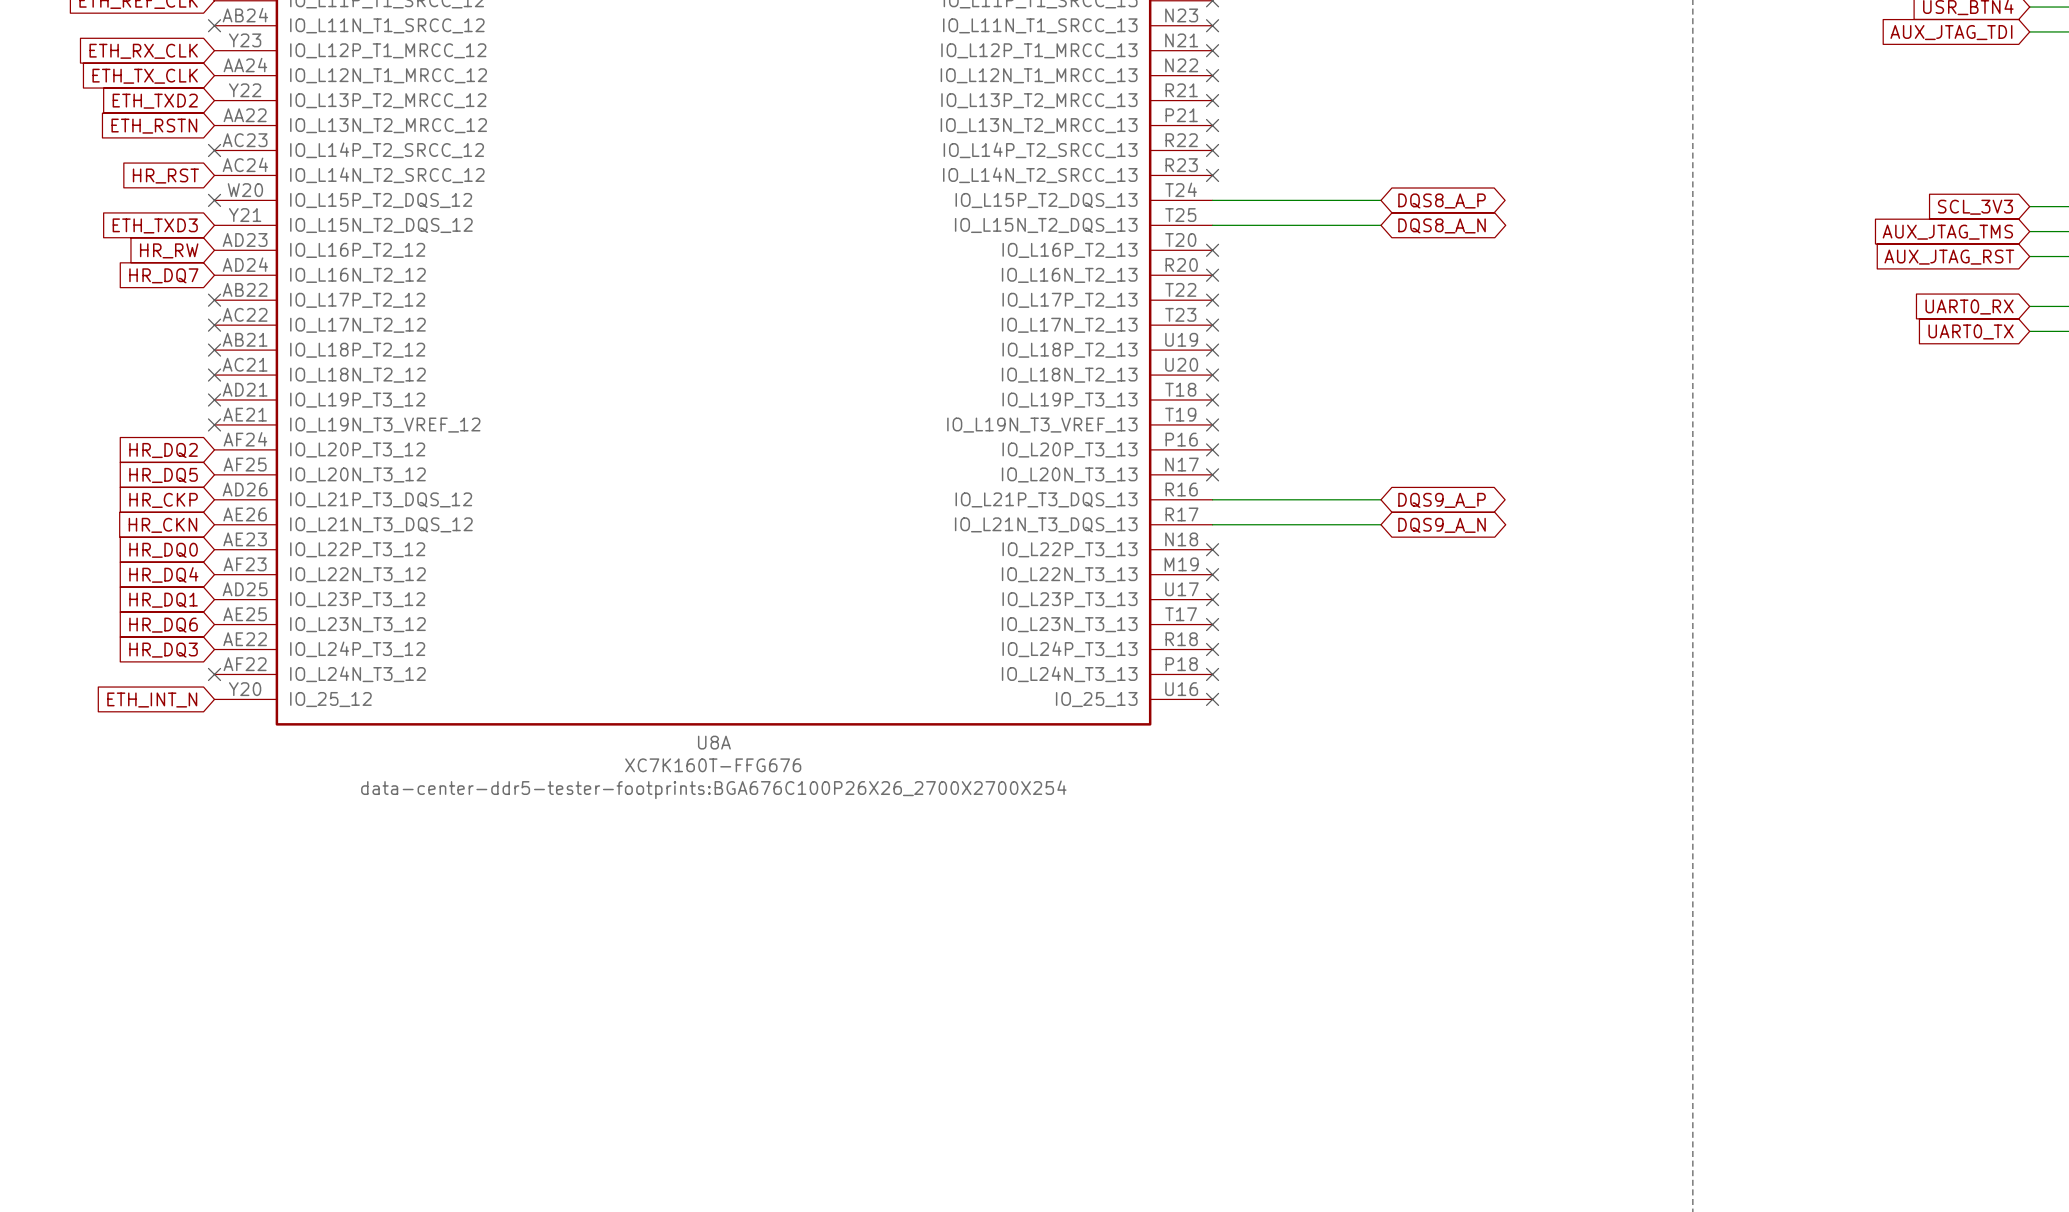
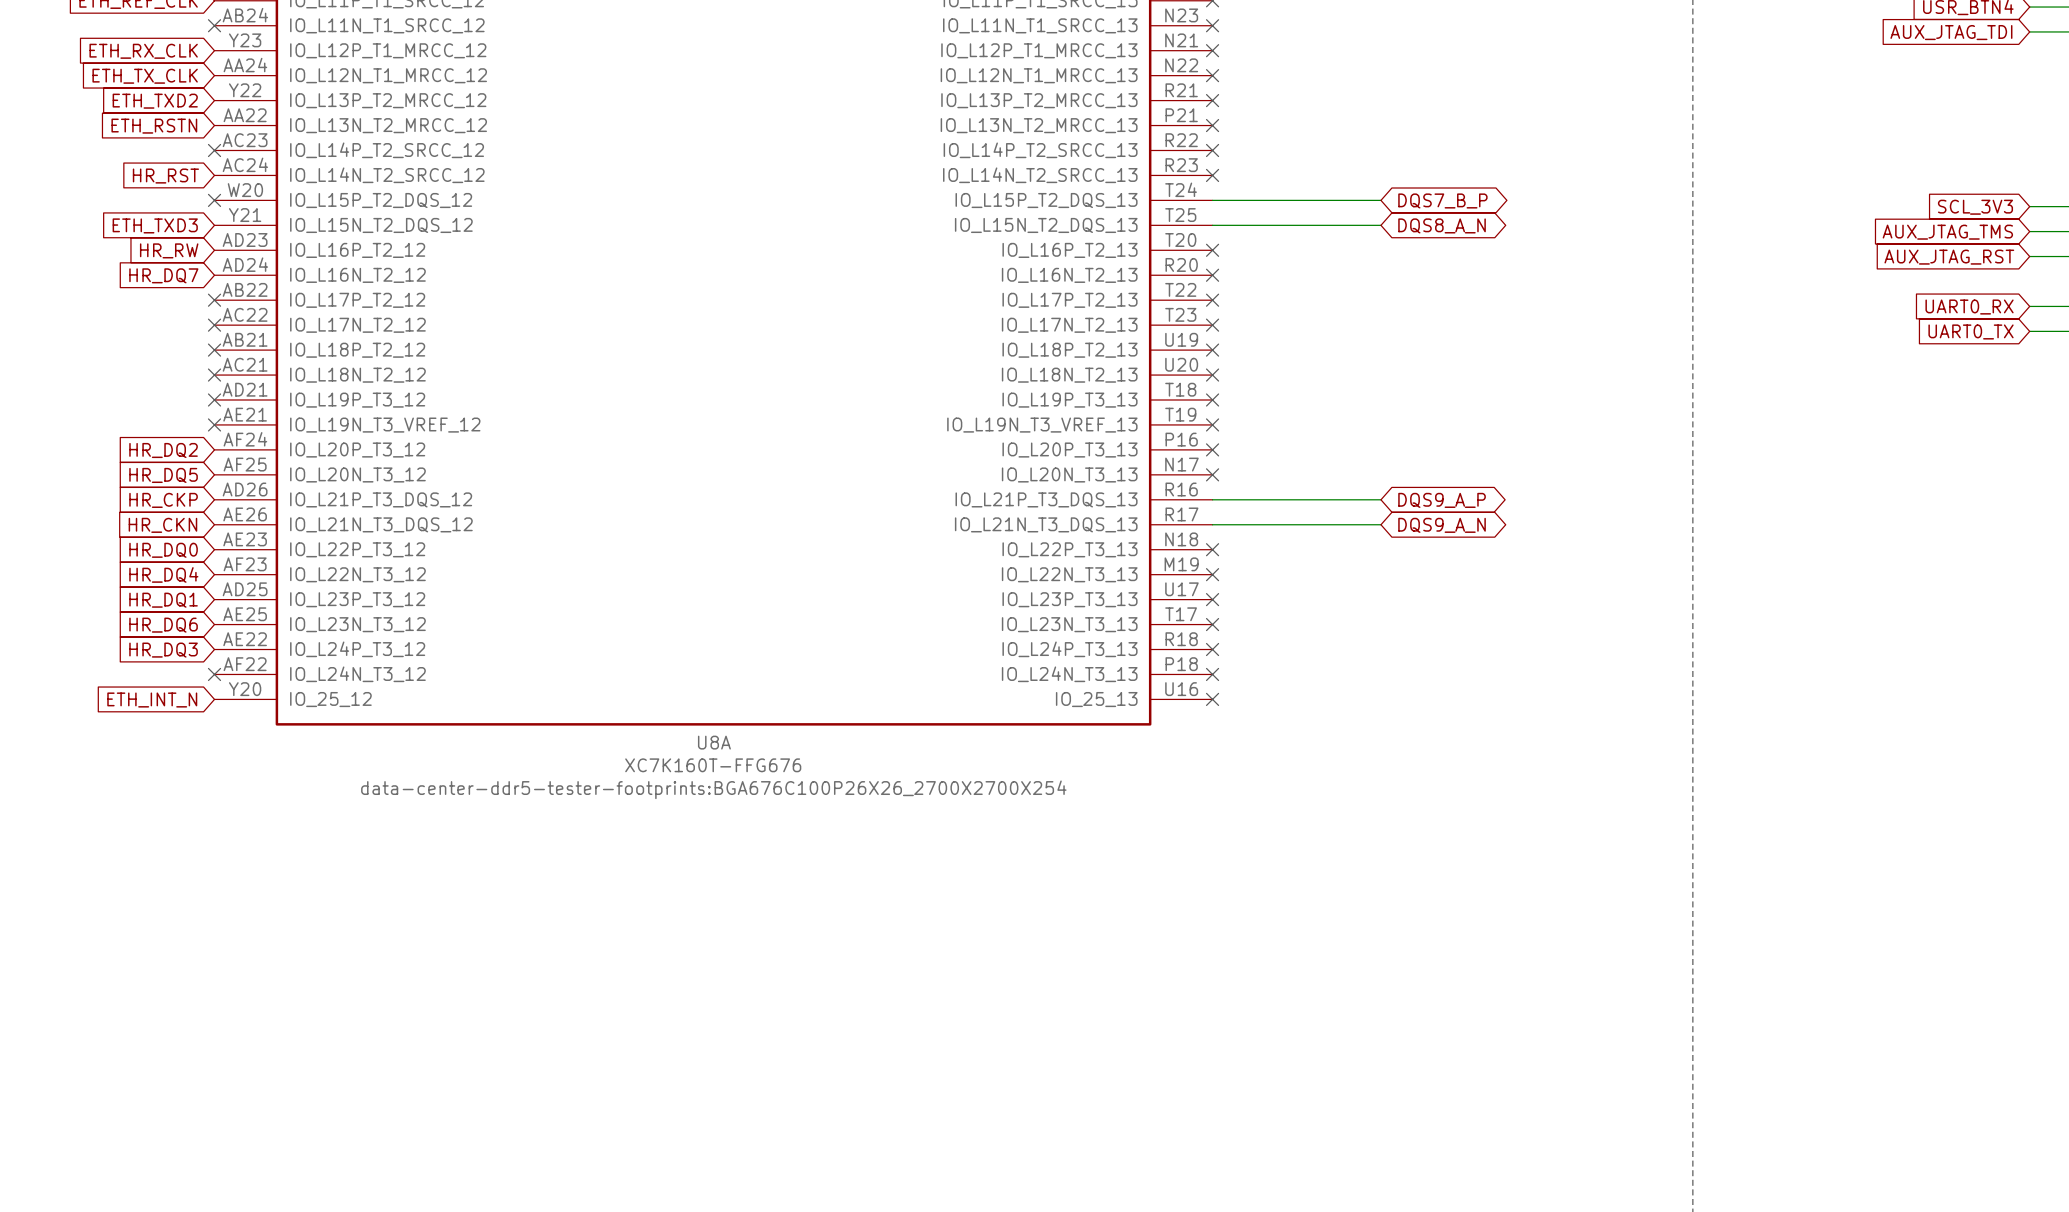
global label: DQS8_A_P (1442, 200) -> DQS7_B_P (1442, 200)

